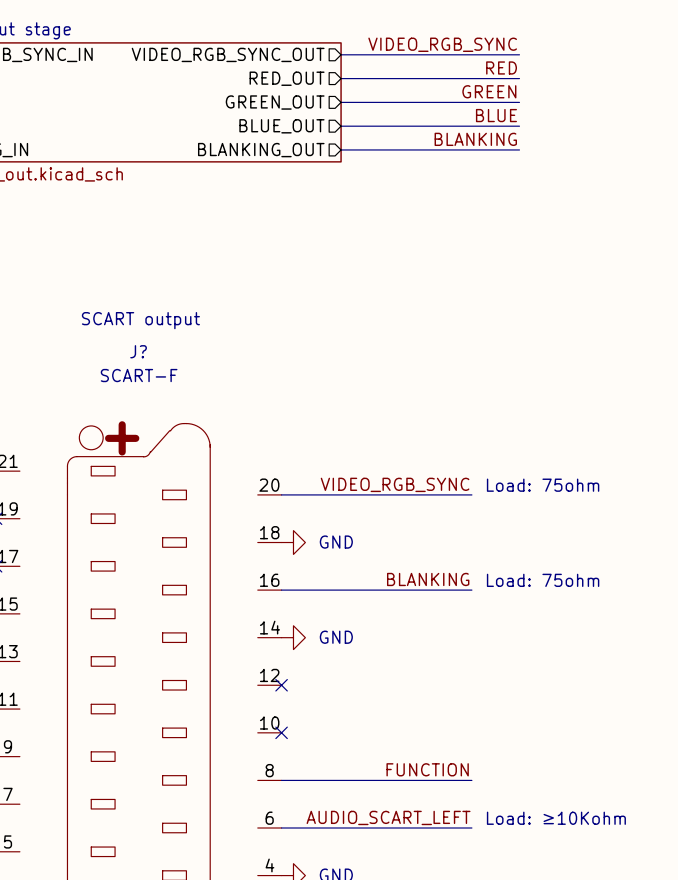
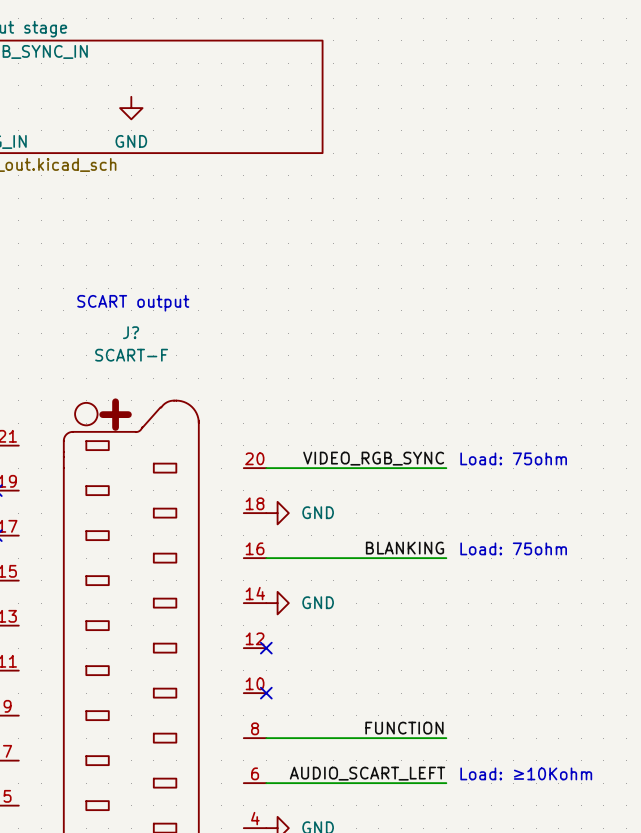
label: VIDEO_RGB_SYNC (442, 44) -> none
sheet pin: VIDEO_RGB_SYNC_OUT (228, 54) -> none
wire: (341, 54) (519, 54) -> none
label: RED (501, 67) -> none
sheet pin: RED_OUT (287, 78) -> none
wire: (341, 78) (519, 78) -> none
label: GREEN (489, 91) -> none
sheet pin: GREEN_OUT (275, 102) -> none
wire: (341, 102) (519, 102) -> none
power symbol: none -> GND (131, 108)
label: BLUE (496, 115) -> none
sheet pin: BLUE_OUT (281, 126) -> none
wire: (341, 126) (519, 126) -> none
label: BLANKING (475, 139) -> none
wire: (341, 149) (519, 149) -> none
sheet pin: BLANKING_OUT (261, 150) -> none

